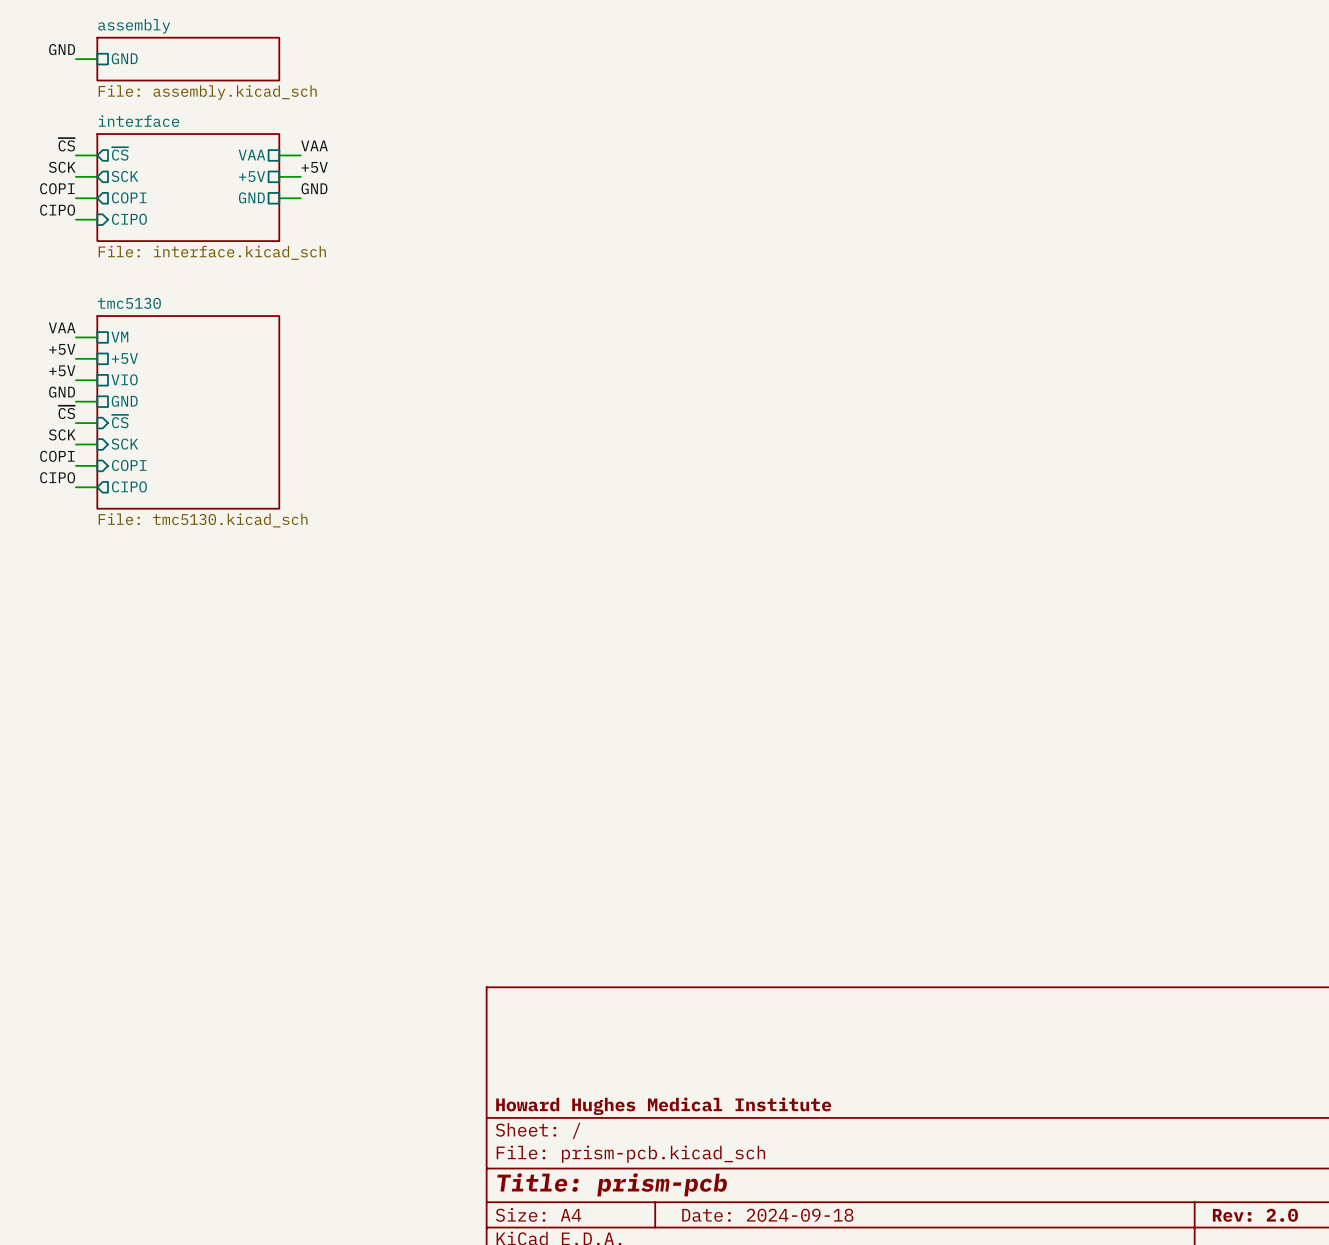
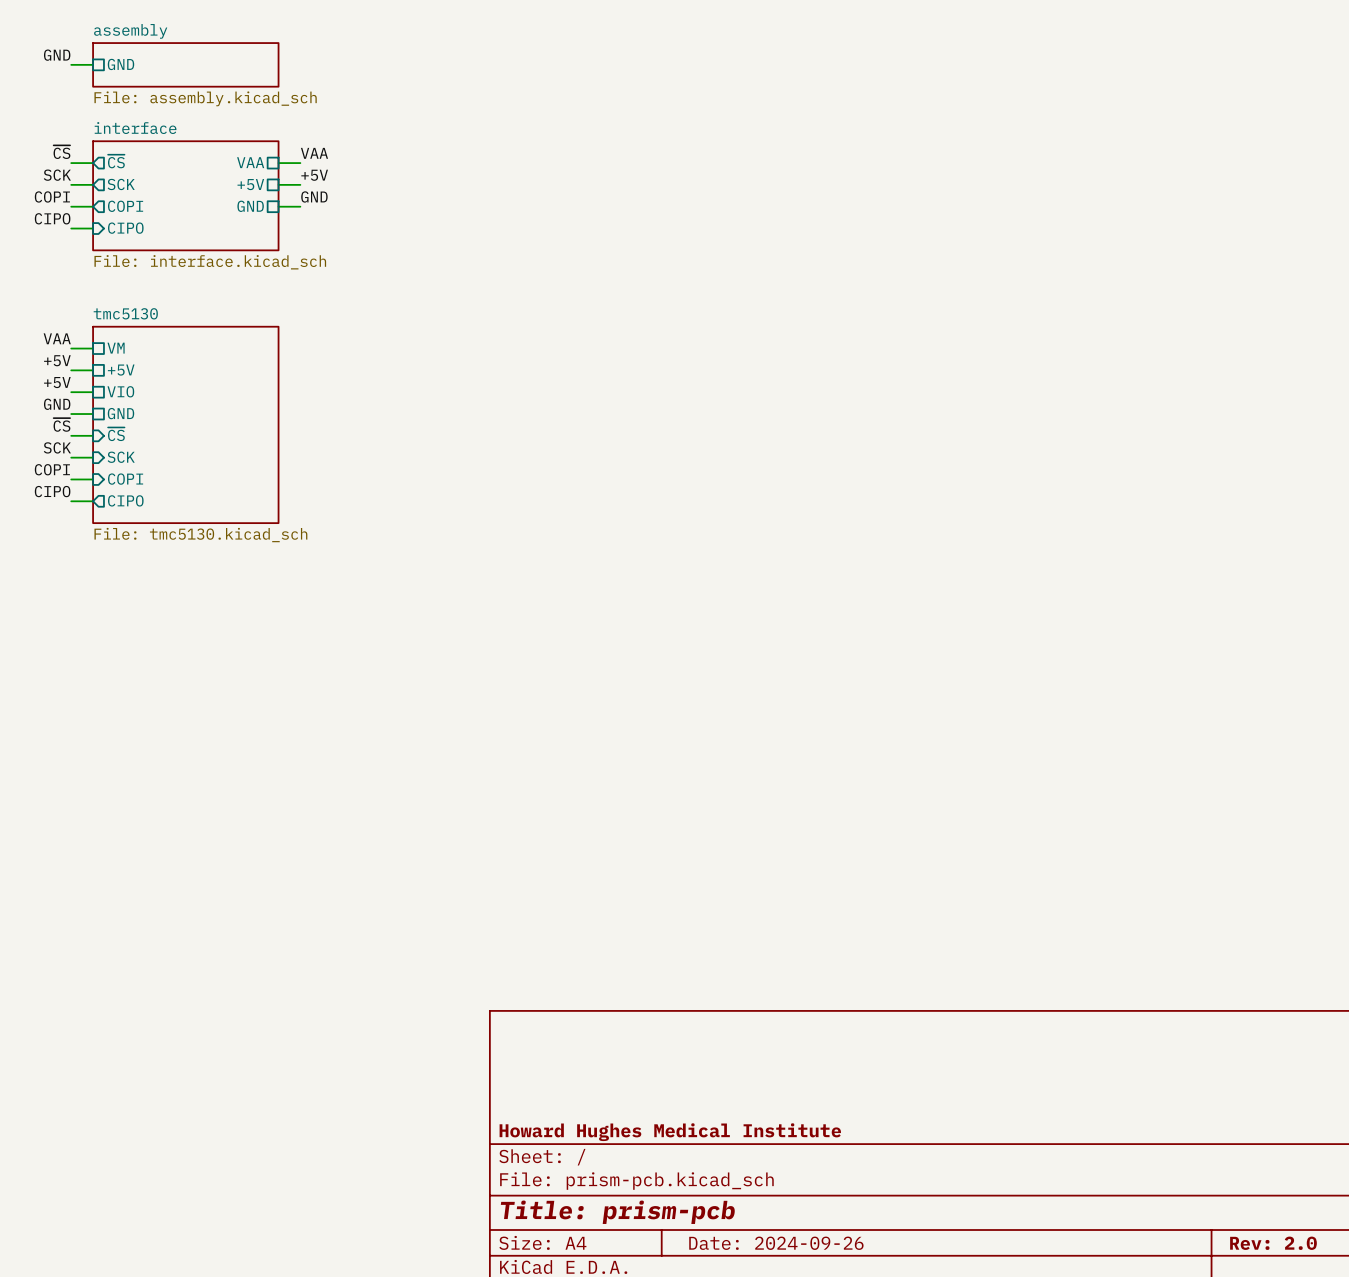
title block: Date: 2024-09-18 (767, 1215) -> Date: 2024-09-26 (776, 1243)

